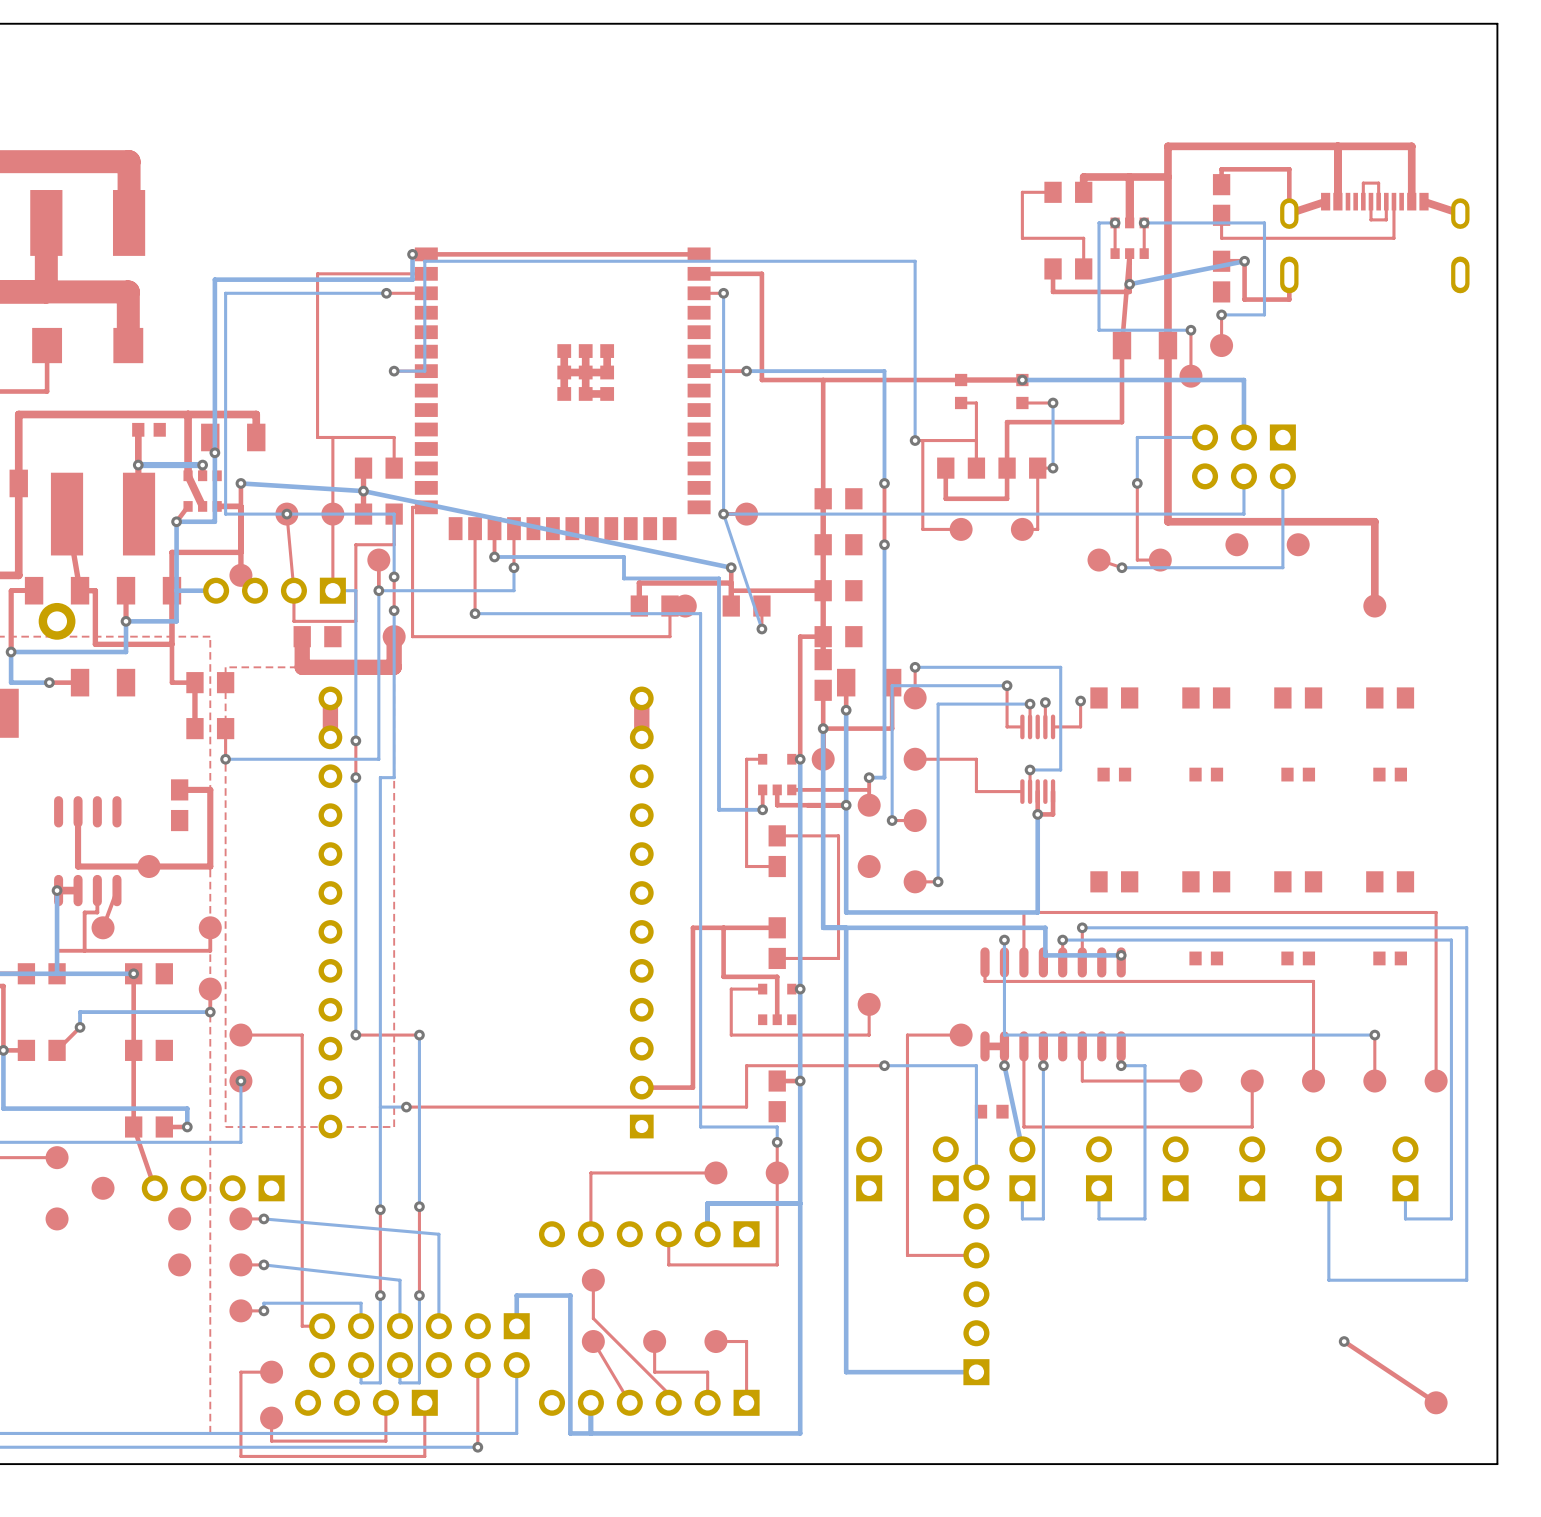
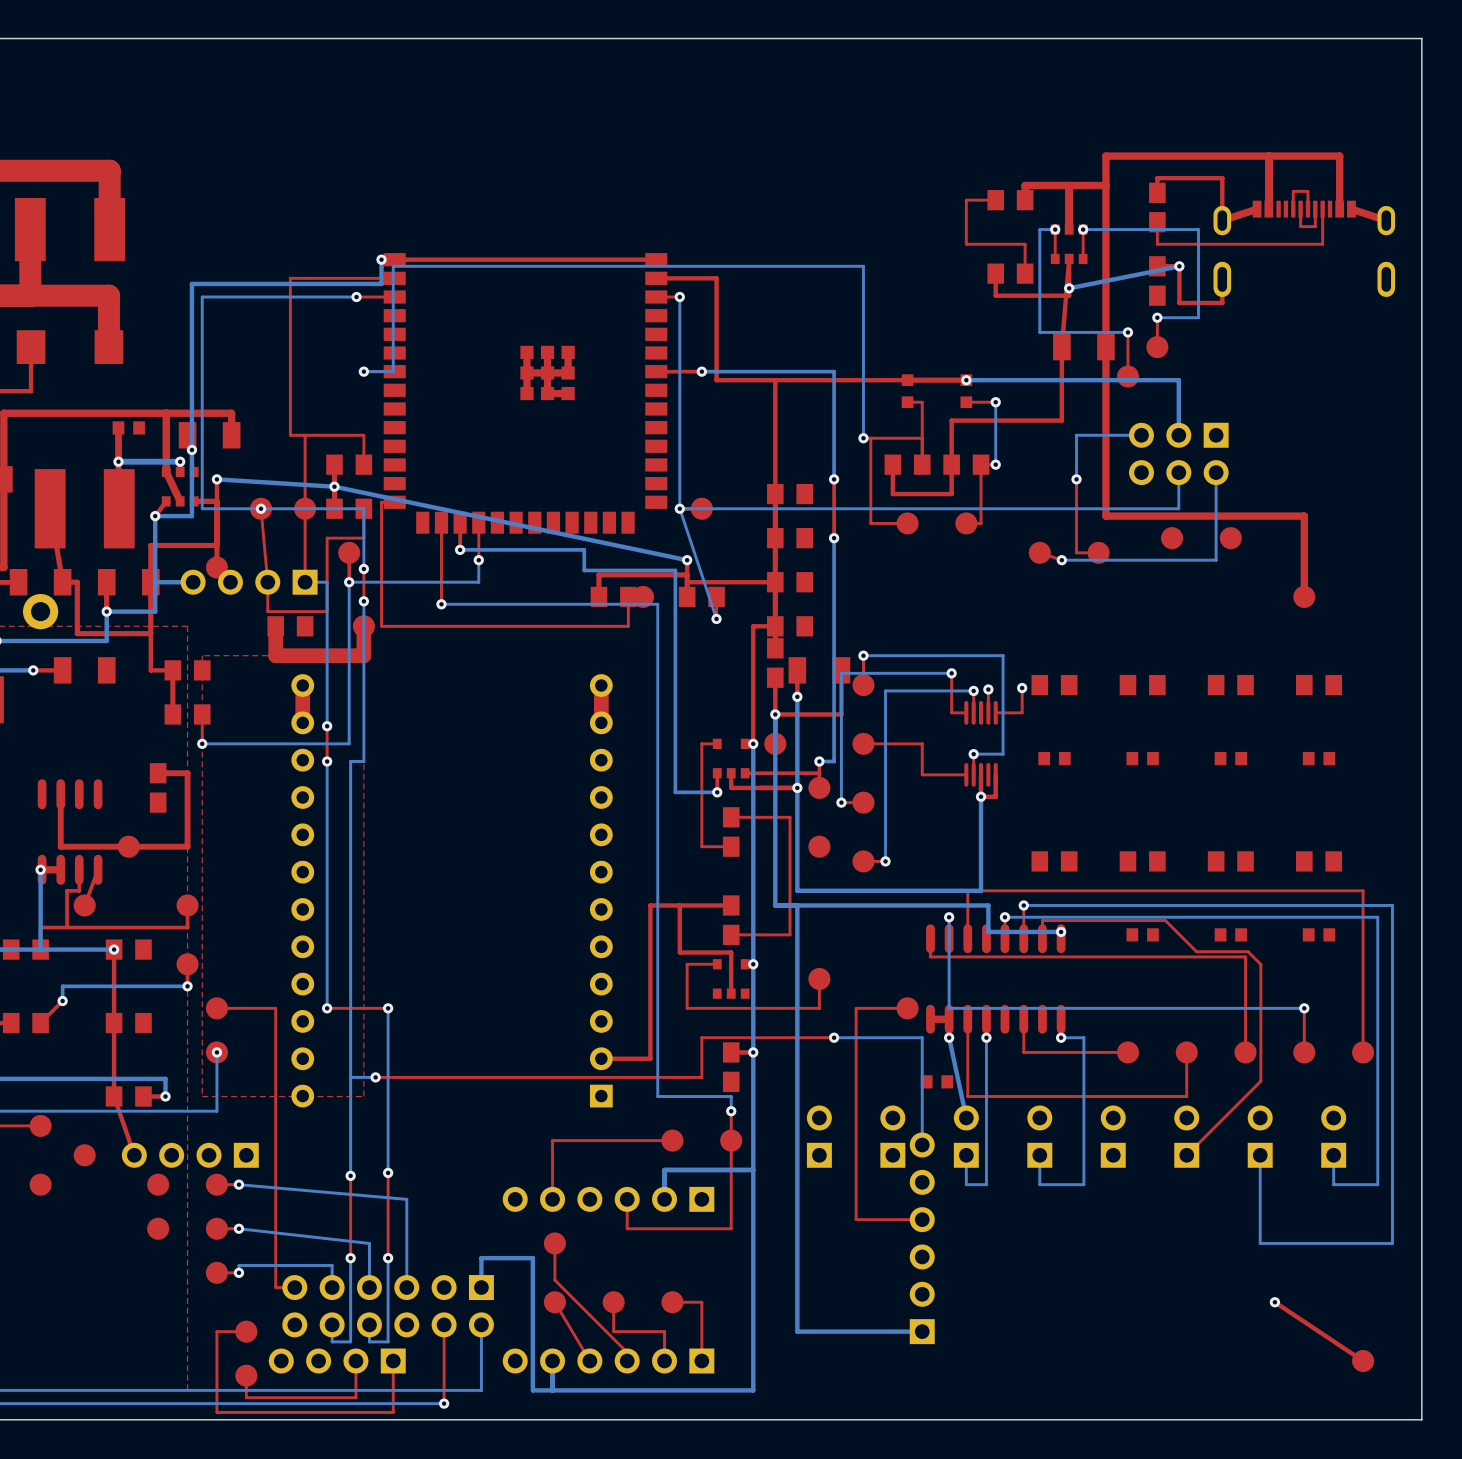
top track: none -> (1042, 938) (1042, 920) (1165, 920) (1196, 951) (1248, 951) (1260, 964) (1260, 1081) (1186, 1155)

